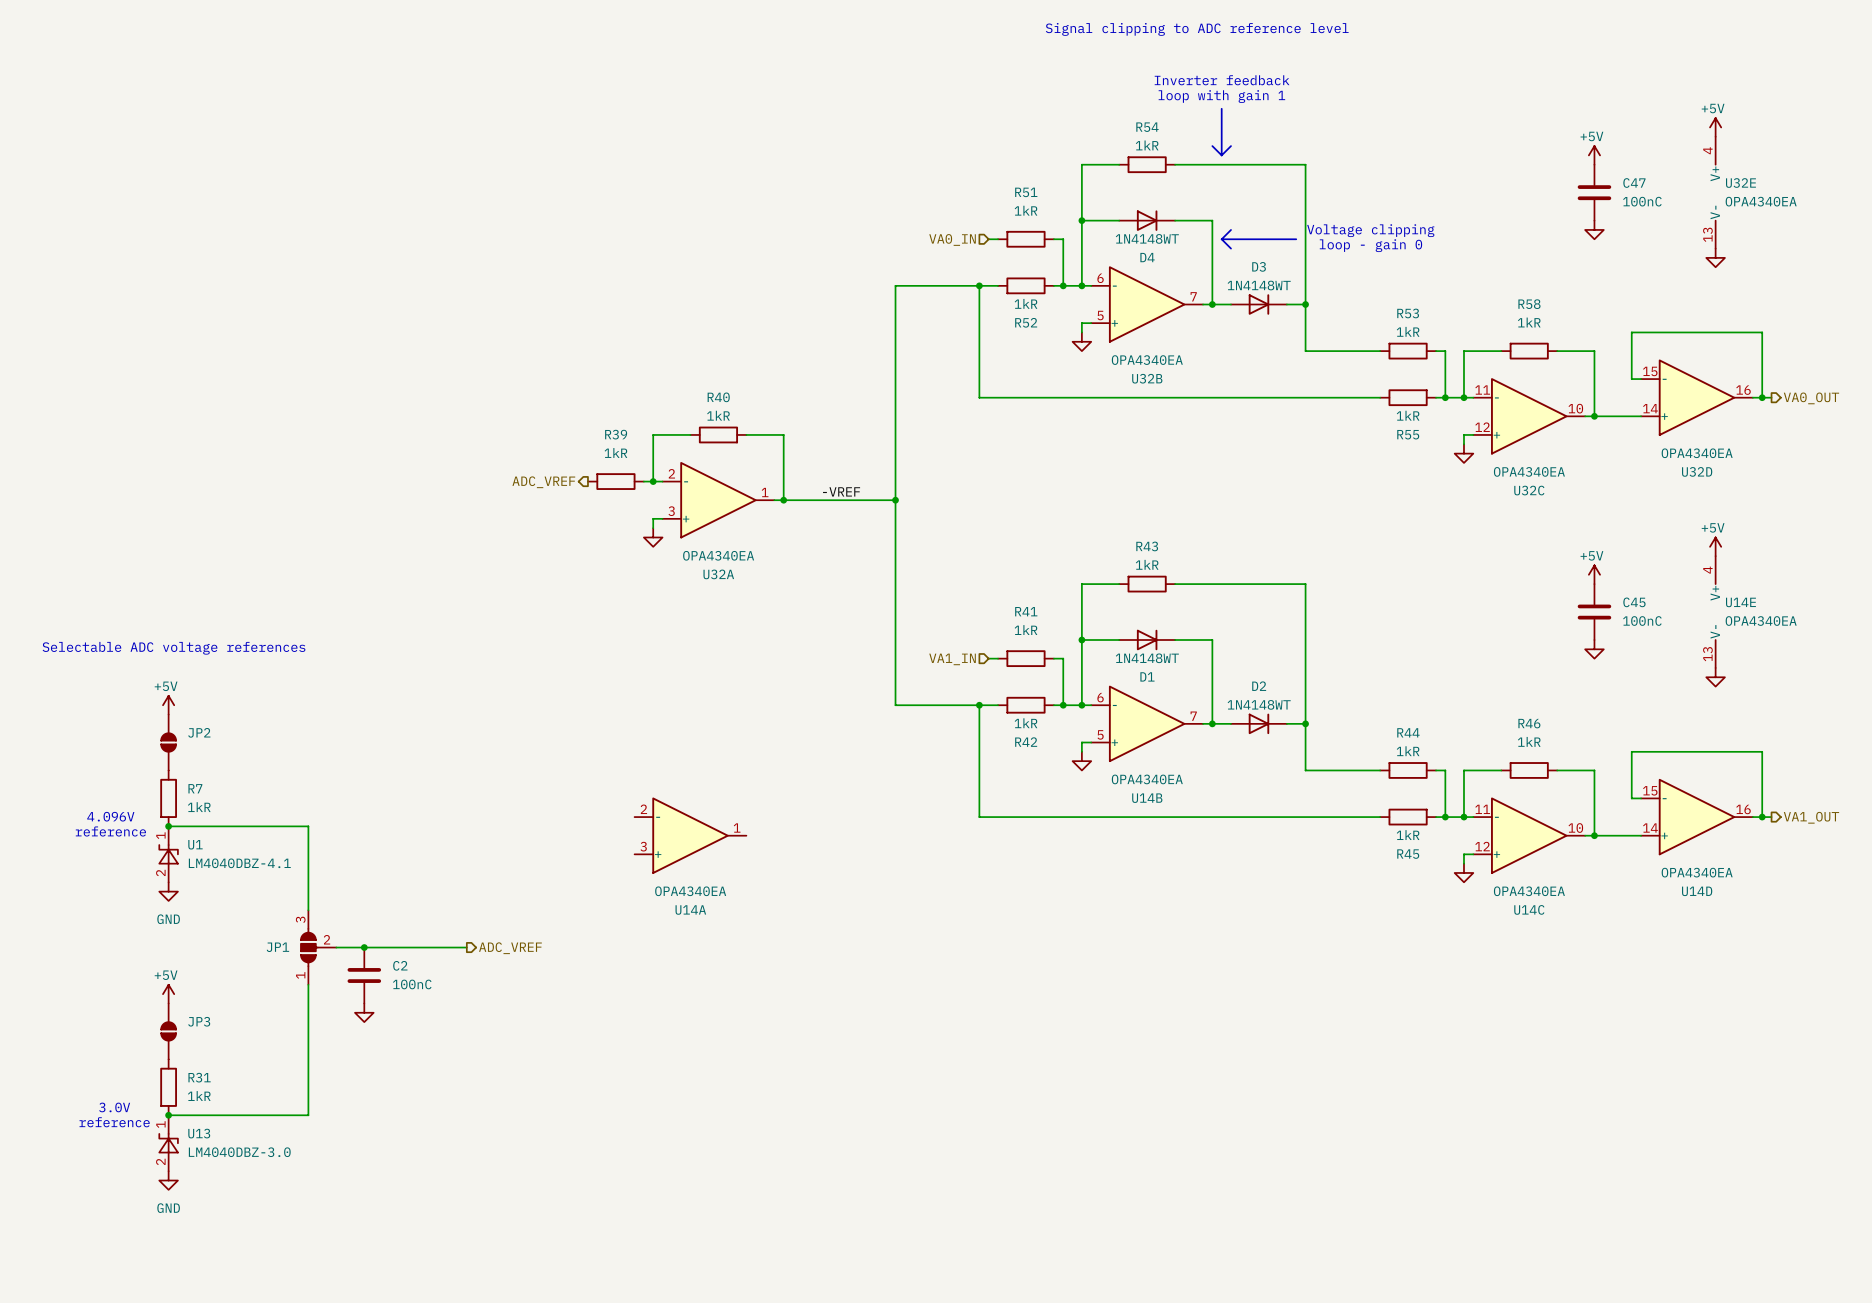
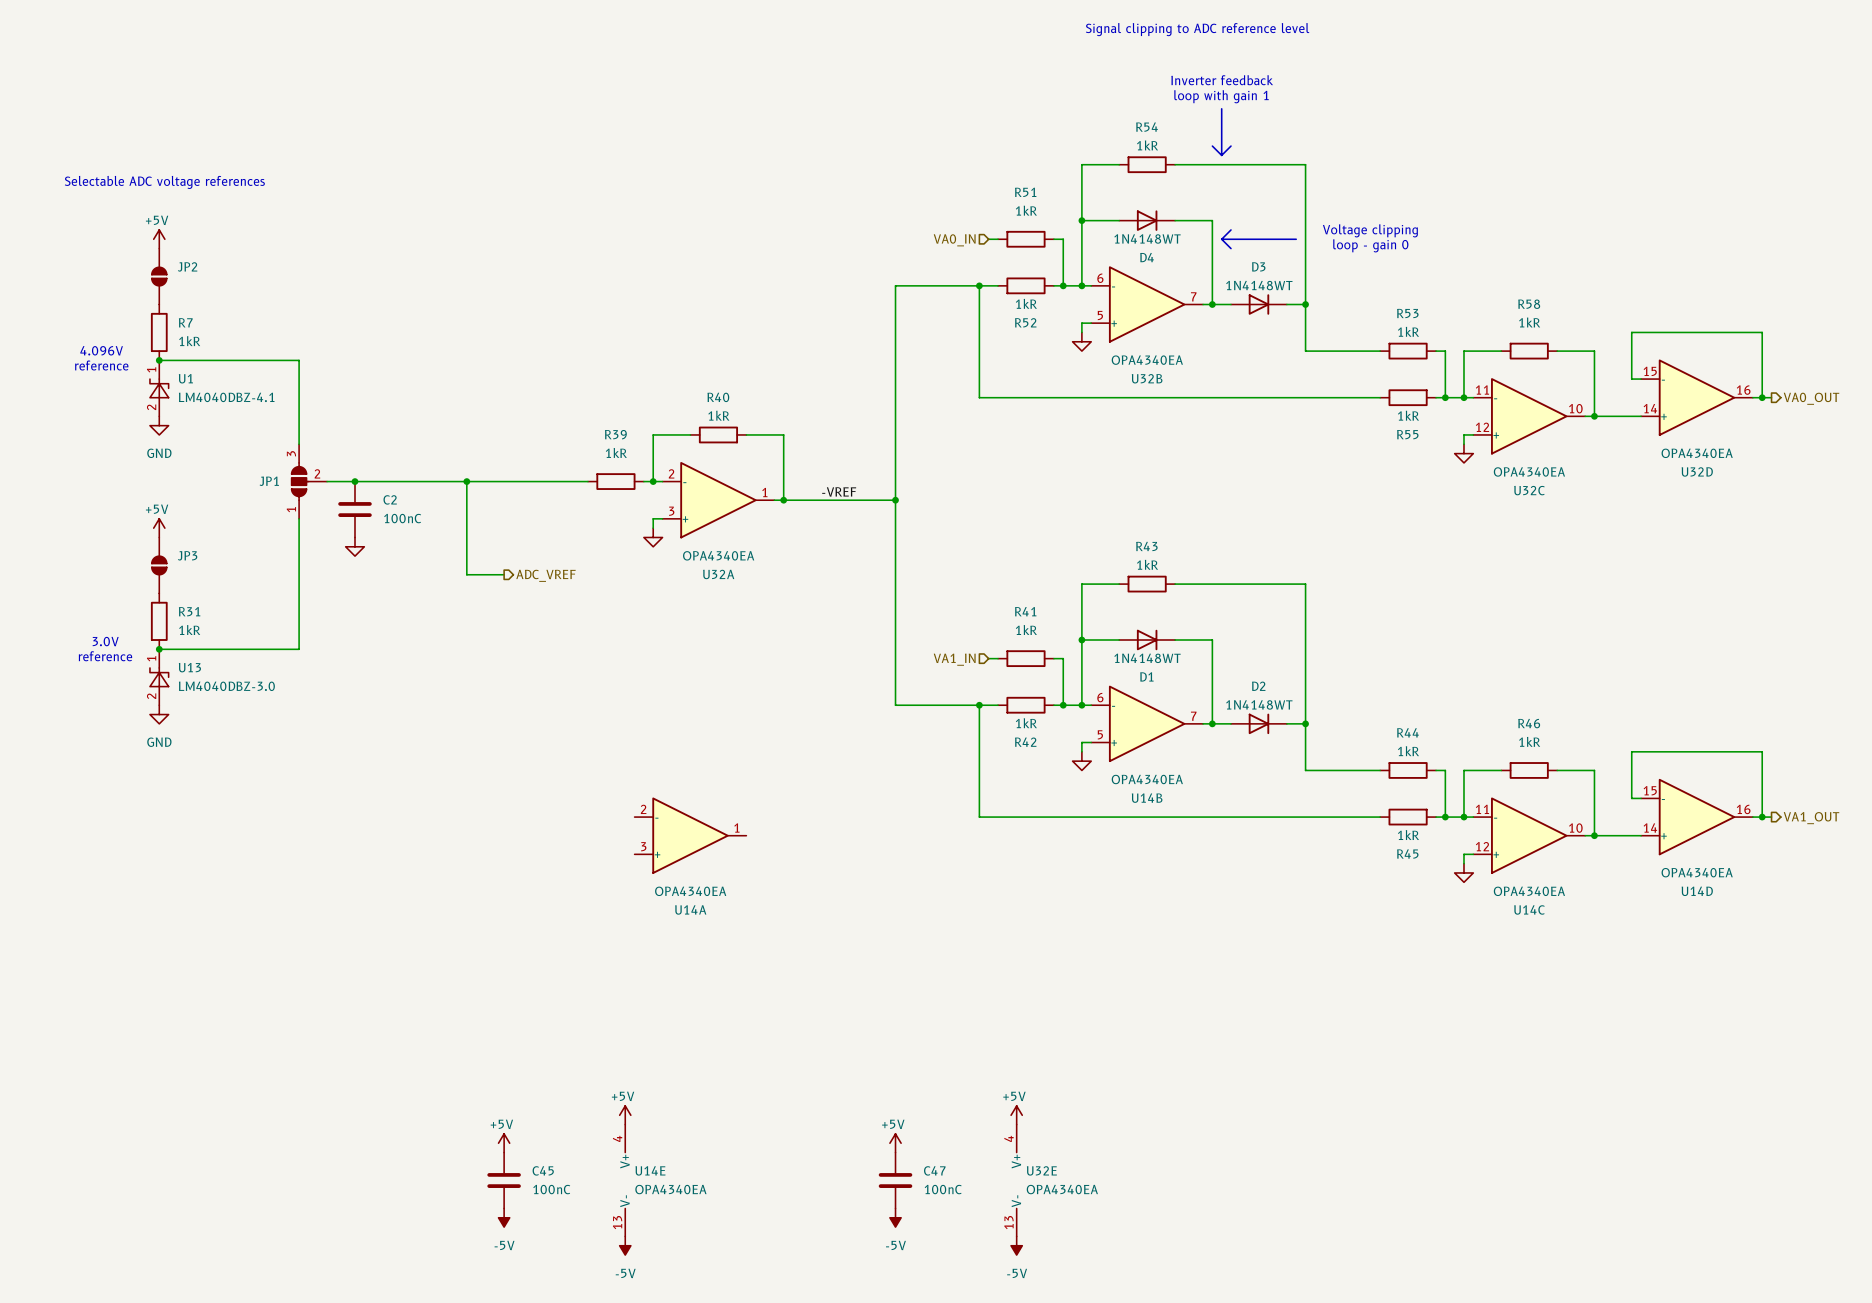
power symbol: +5V (1715, 127) -> none
power symbol: +5V (1594, 155) -> none
text: none -> Selectable ADC voltage references (164, 182)
C47 position: (1594, 192) -> (895, 1180)
U32E position: (1715, 192) -> (1016, 1180)
power symbol: (1594, 229) -> none
power symbol: none -> +5V (159, 239)
power symbol: (1715, 257) -> none
text: none -> 4.096V (101, 350)
wire: none -> (159, 360) (299, 360) (299, 444)
junction: none -> (159, 360)
text: none -> reference (101, 365)
power symbol: none -> GND (159, 425)
wire: none -> (327, 481) (587, 481)
junction: none -> (354, 481)
wire: none -> (466, 481) (466, 574) (504, 574)
junction: none -> (466, 481)
hierarchical label rotation: 0° (543, 482) -> 180° (546, 575)
hierarchical label position: ADC_VREF (543, 482) -> ADC_VREF (546, 575)
wire: none -> (299, 518) (299, 649) (159, 649)
power symbol: none -> (354, 546)
power symbol: +5V (1715, 546) -> none
power symbol: +5V (1594, 574) -> none
C45 position: (1594, 612) -> (504, 1180)
U14E position: (1715, 612) -> (625, 1180)
text: none -> 3.0V (105, 641)
text: Selectable ADC voltage references (173, 648) -> none
junction: none -> (159, 649)
power symbol: (1594, 649) -> none
power symbol: (1715, 677) -> none
power symbol position: +5V (168, 705) -> +5V (159, 528)
JP2 position: (168, 742) -> (159, 276)
R7 position: (168, 798) -> (159, 332)
text: 4.096V (110, 816) -> none
wire: (168, 826) (308, 826) (308, 910) -> none
junction: (168, 826) -> none
text position: reference (110, 831) -> reference (105, 656)
U1 position: (168, 854) -> (159, 388)
power symbol position: GND (168, 891) -> GND (159, 714)
JP1 position: (318, 947) -> (309, 481)
wire: (336, 947) (466, 947) -> none
junction: (364, 947) -> none
hierarchical label: ADC_VREF (510, 948) -> none
C2 position: (364, 975) -> (354, 509)
wire: (308, 984) (308, 1115) (168, 1115) -> none
power symbol: +5V (168, 994) -> none
power symbol: (364, 1012) -> none
JP3 position: (168, 1031) -> (159, 565)
R31 position: (168, 1087) -> (159, 621)
text: 3.0V (114, 1107) -> none
junction: (168, 1115) -> none
power symbol: none -> +5V (625, 1115)
power symbol: none -> +5V (1016, 1115)
text: reference (114, 1122) -> none
U13 position: (168, 1143) -> (159, 677)
power symbol: none -> +5V (504, 1143)
power symbol: none -> +5V (895, 1143)
power symbol: GND (168, 1180) -> none
power symbol: none -> -5V (504, 1217)
power symbol: none -> -5V (895, 1217)
power symbol: none -> -5V (625, 1245)
power symbol: none -> -5V (1016, 1245)

